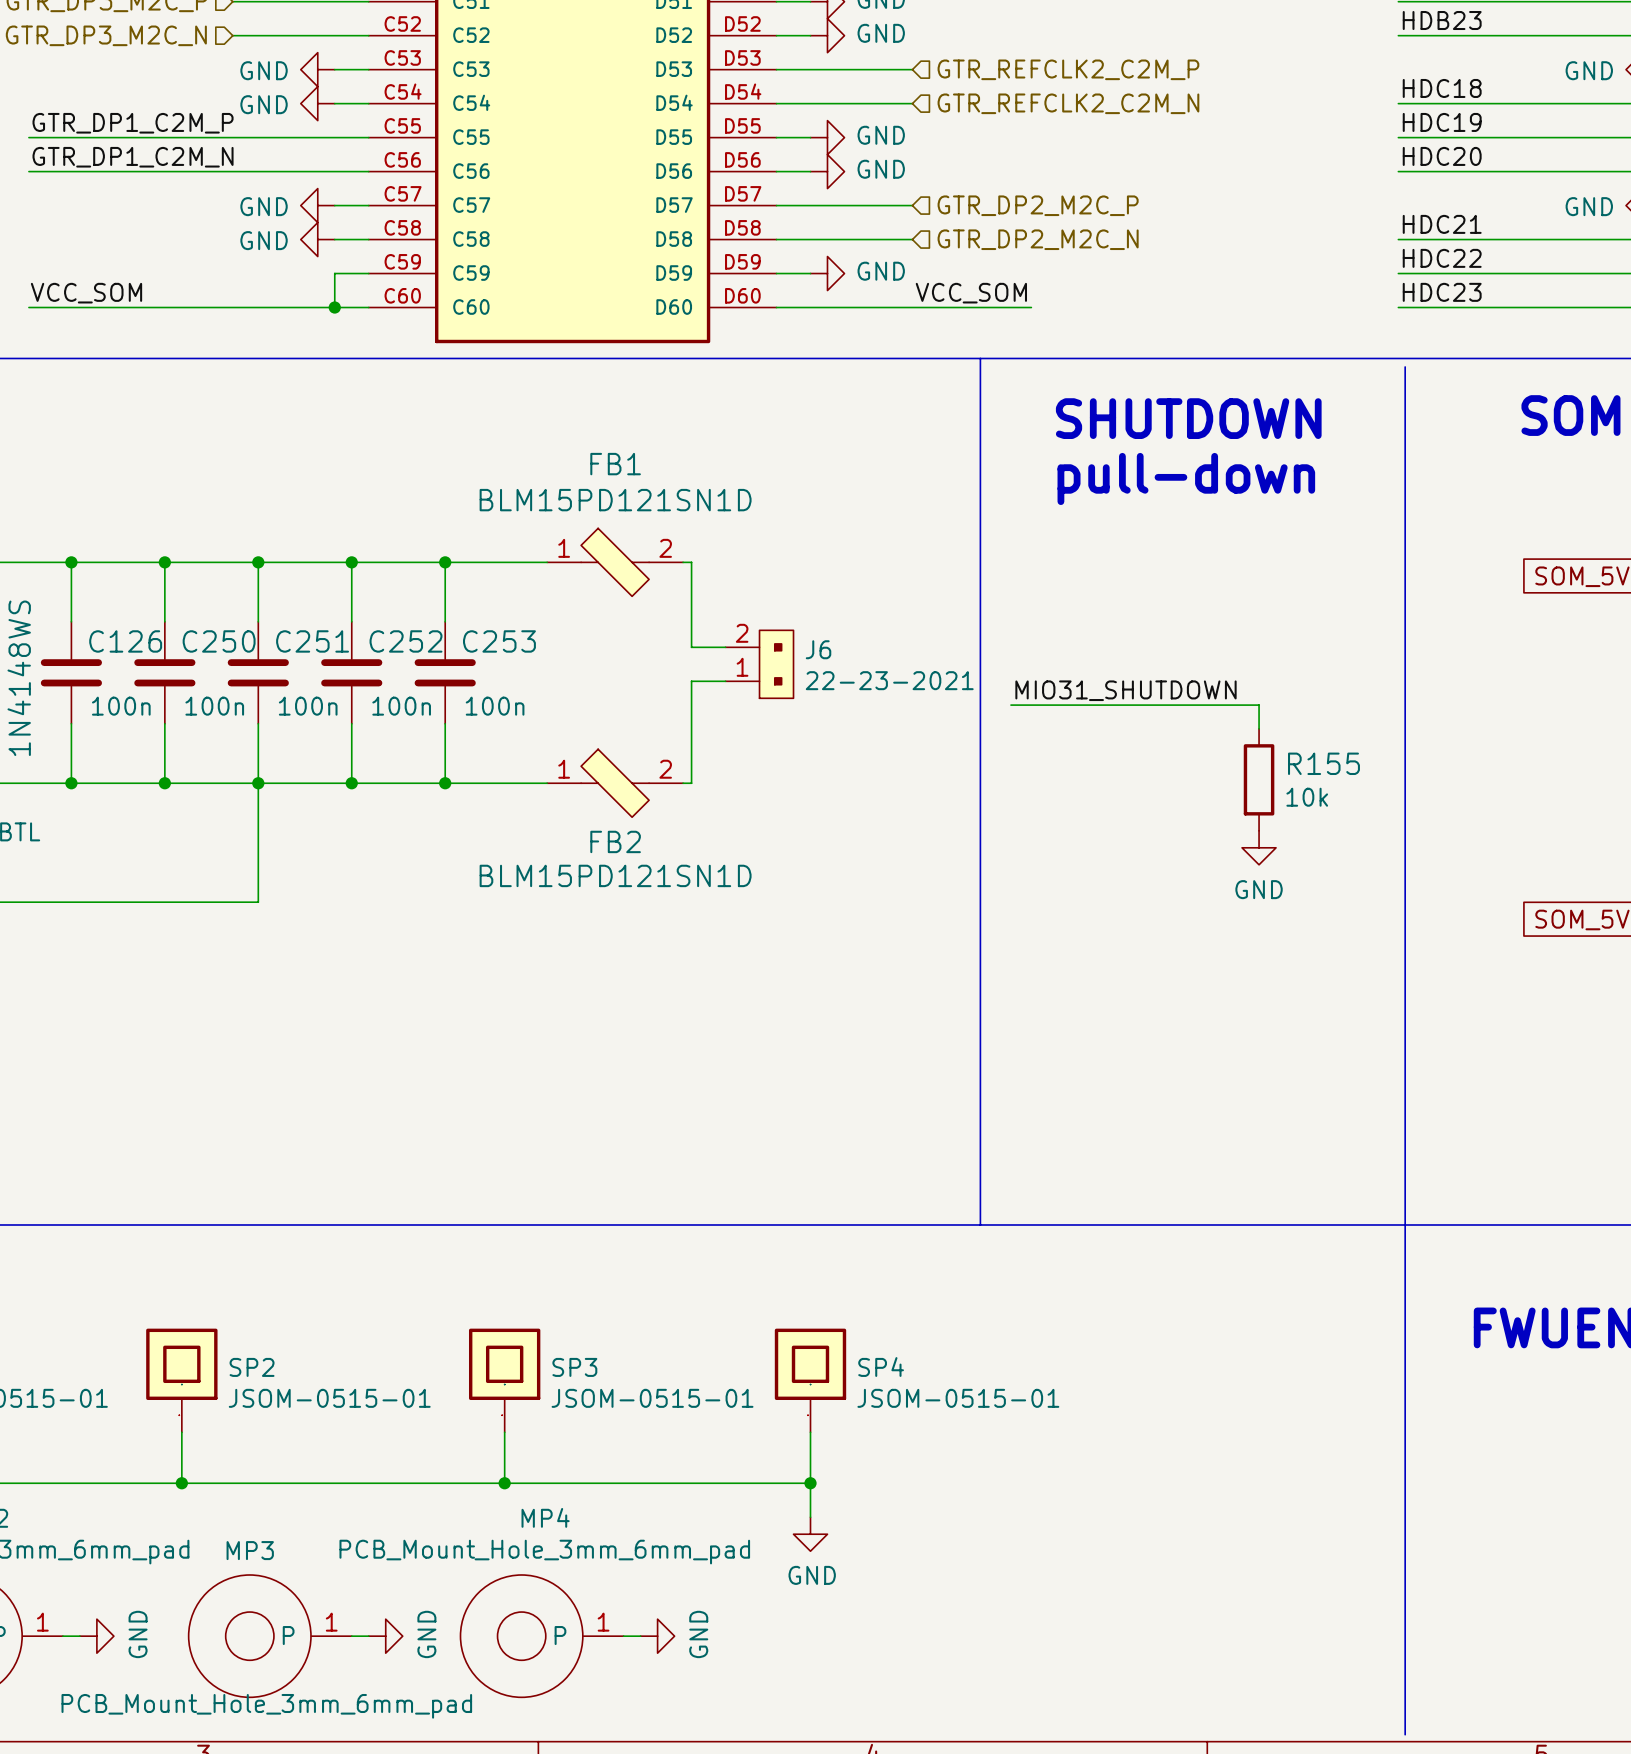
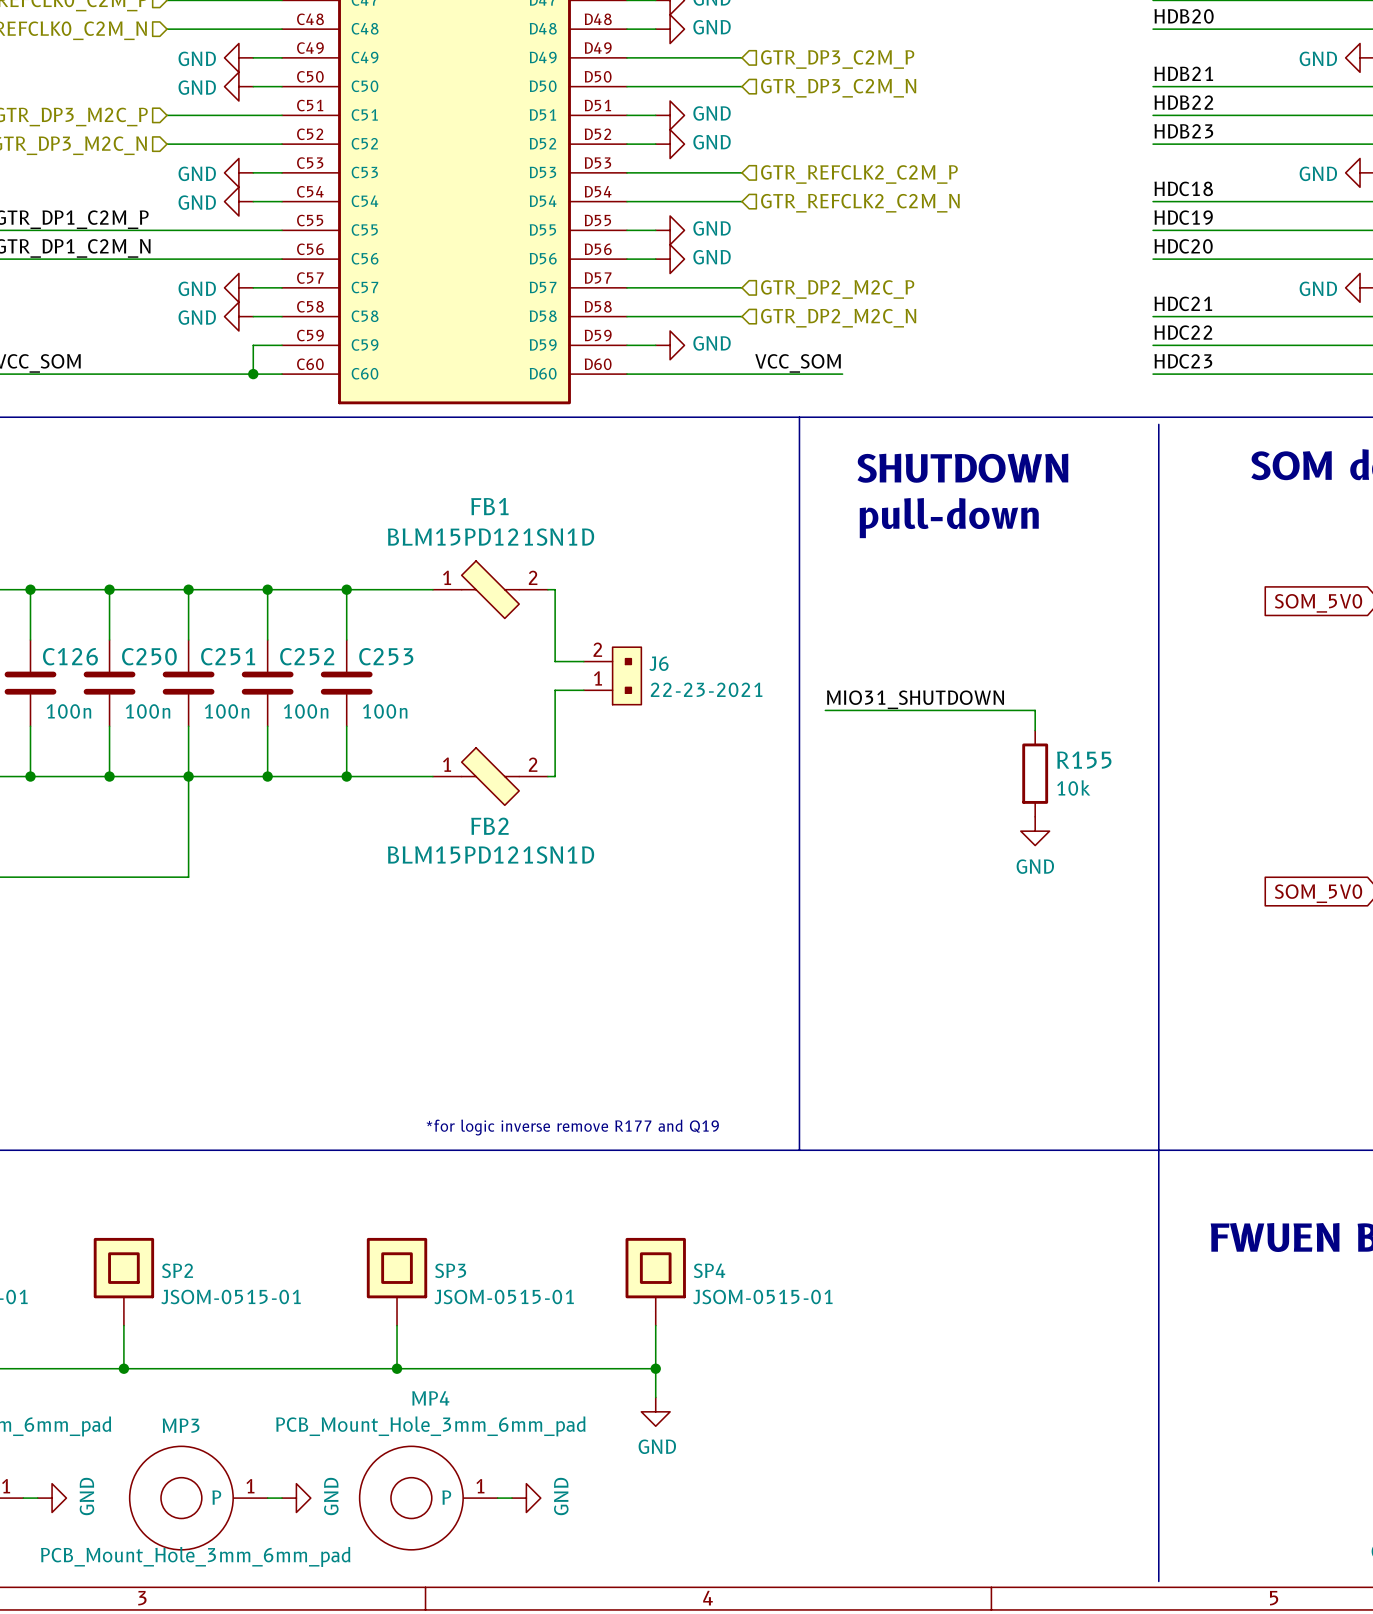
text: none -> *for logic inverse remove R177 and Q19 (572, 1127)

